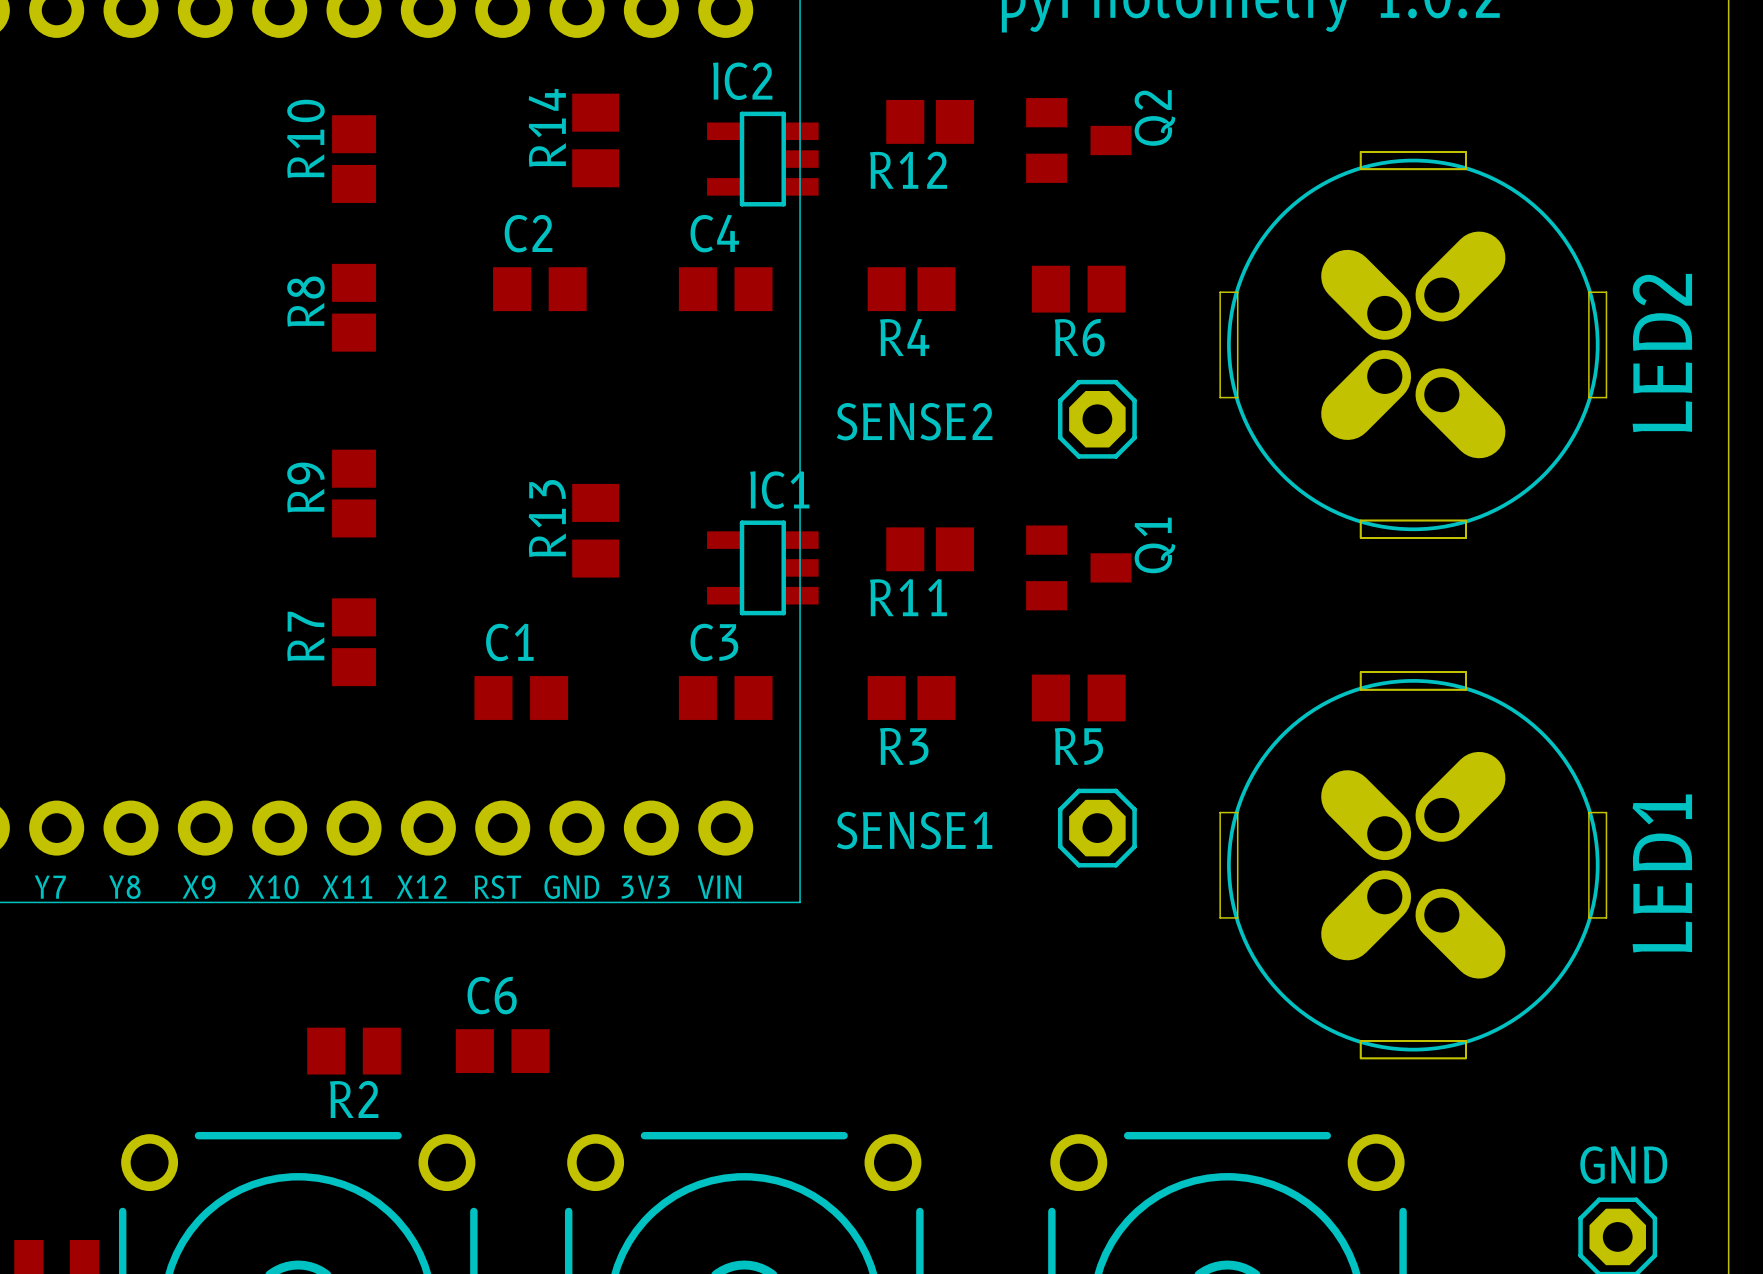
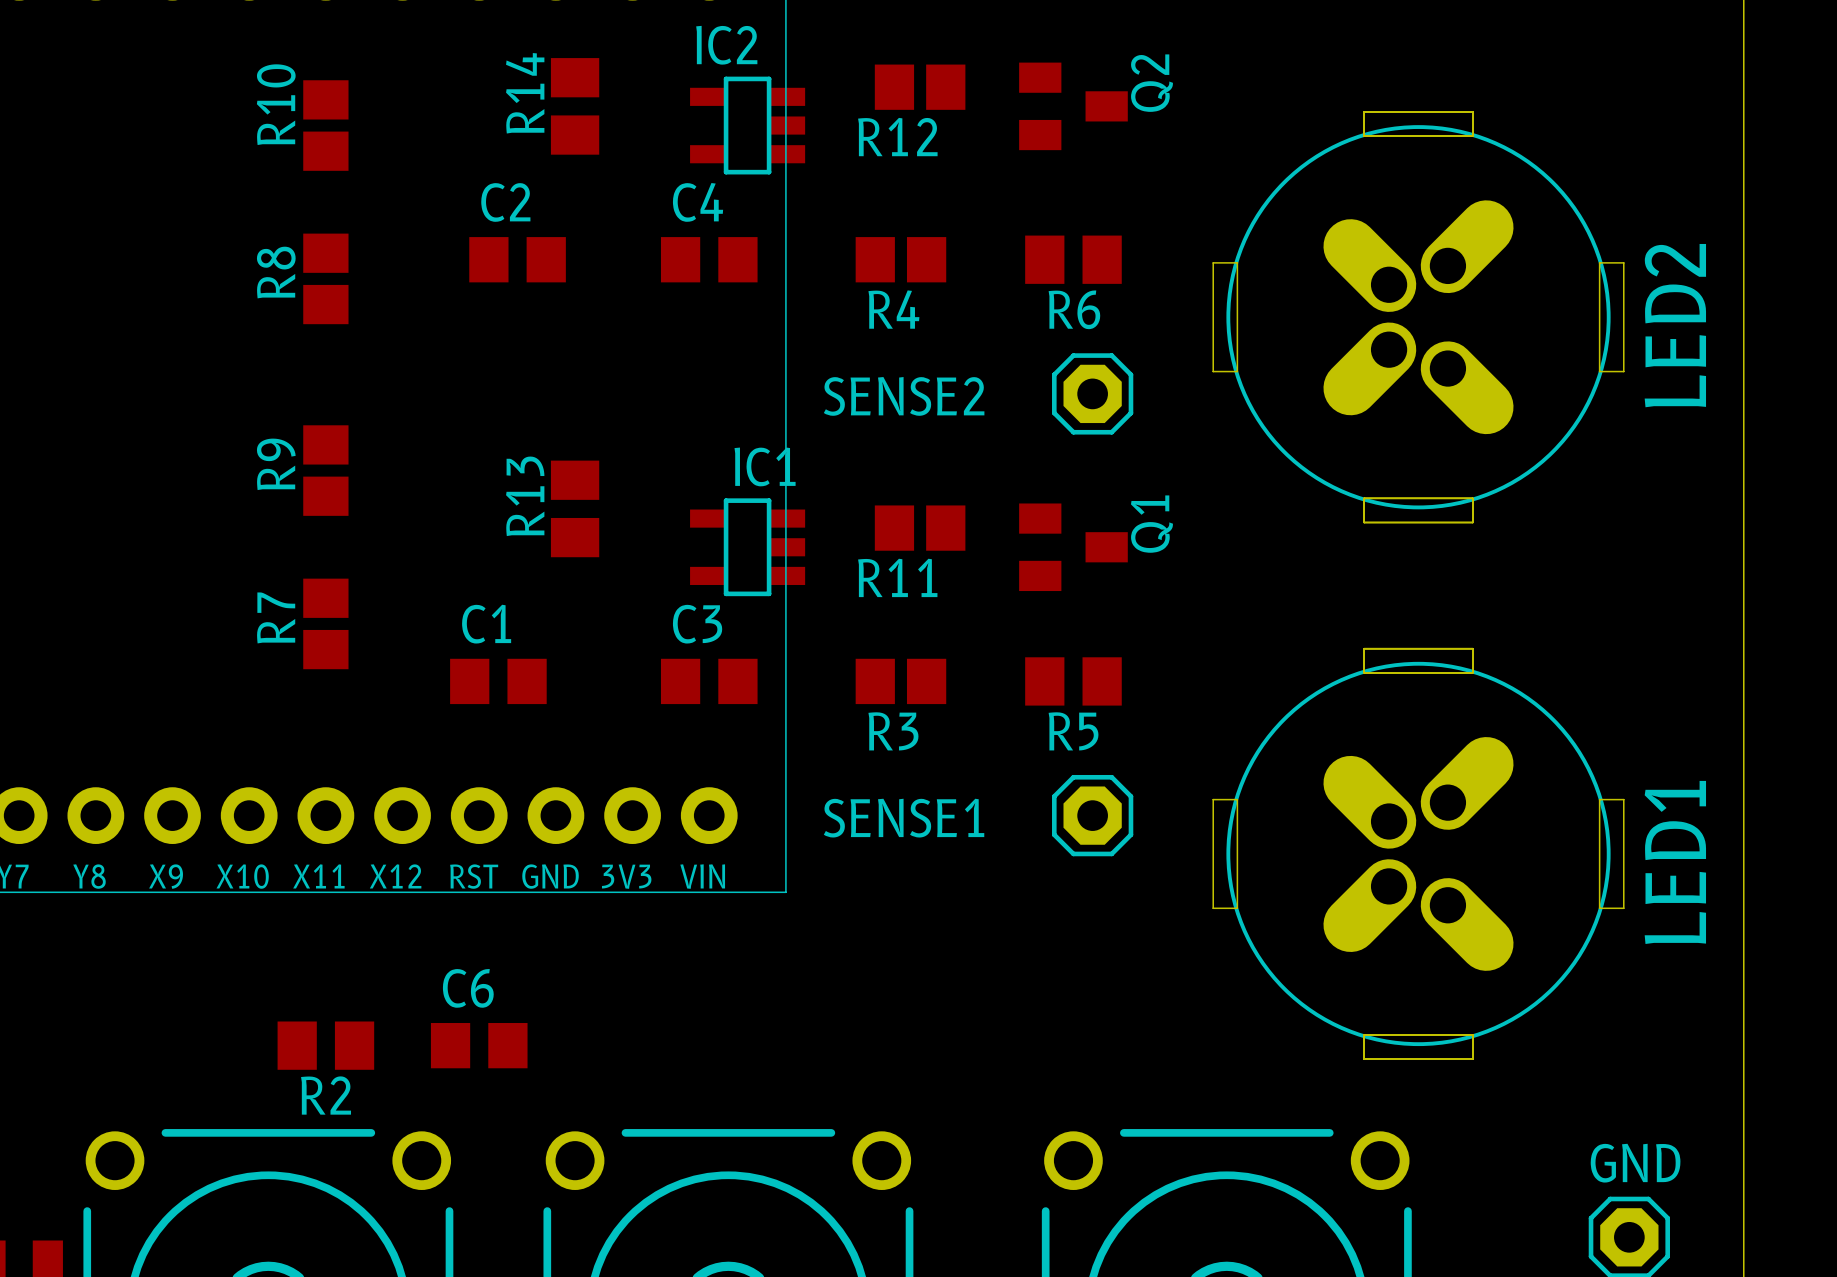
LED2 footprint: [1220, 151, 1607, 539] -> [1213, 111, 1624, 523]
LED1 footprint: [1220, 672, 1607, 1059] -> [1213, 648, 1624, 1060]

